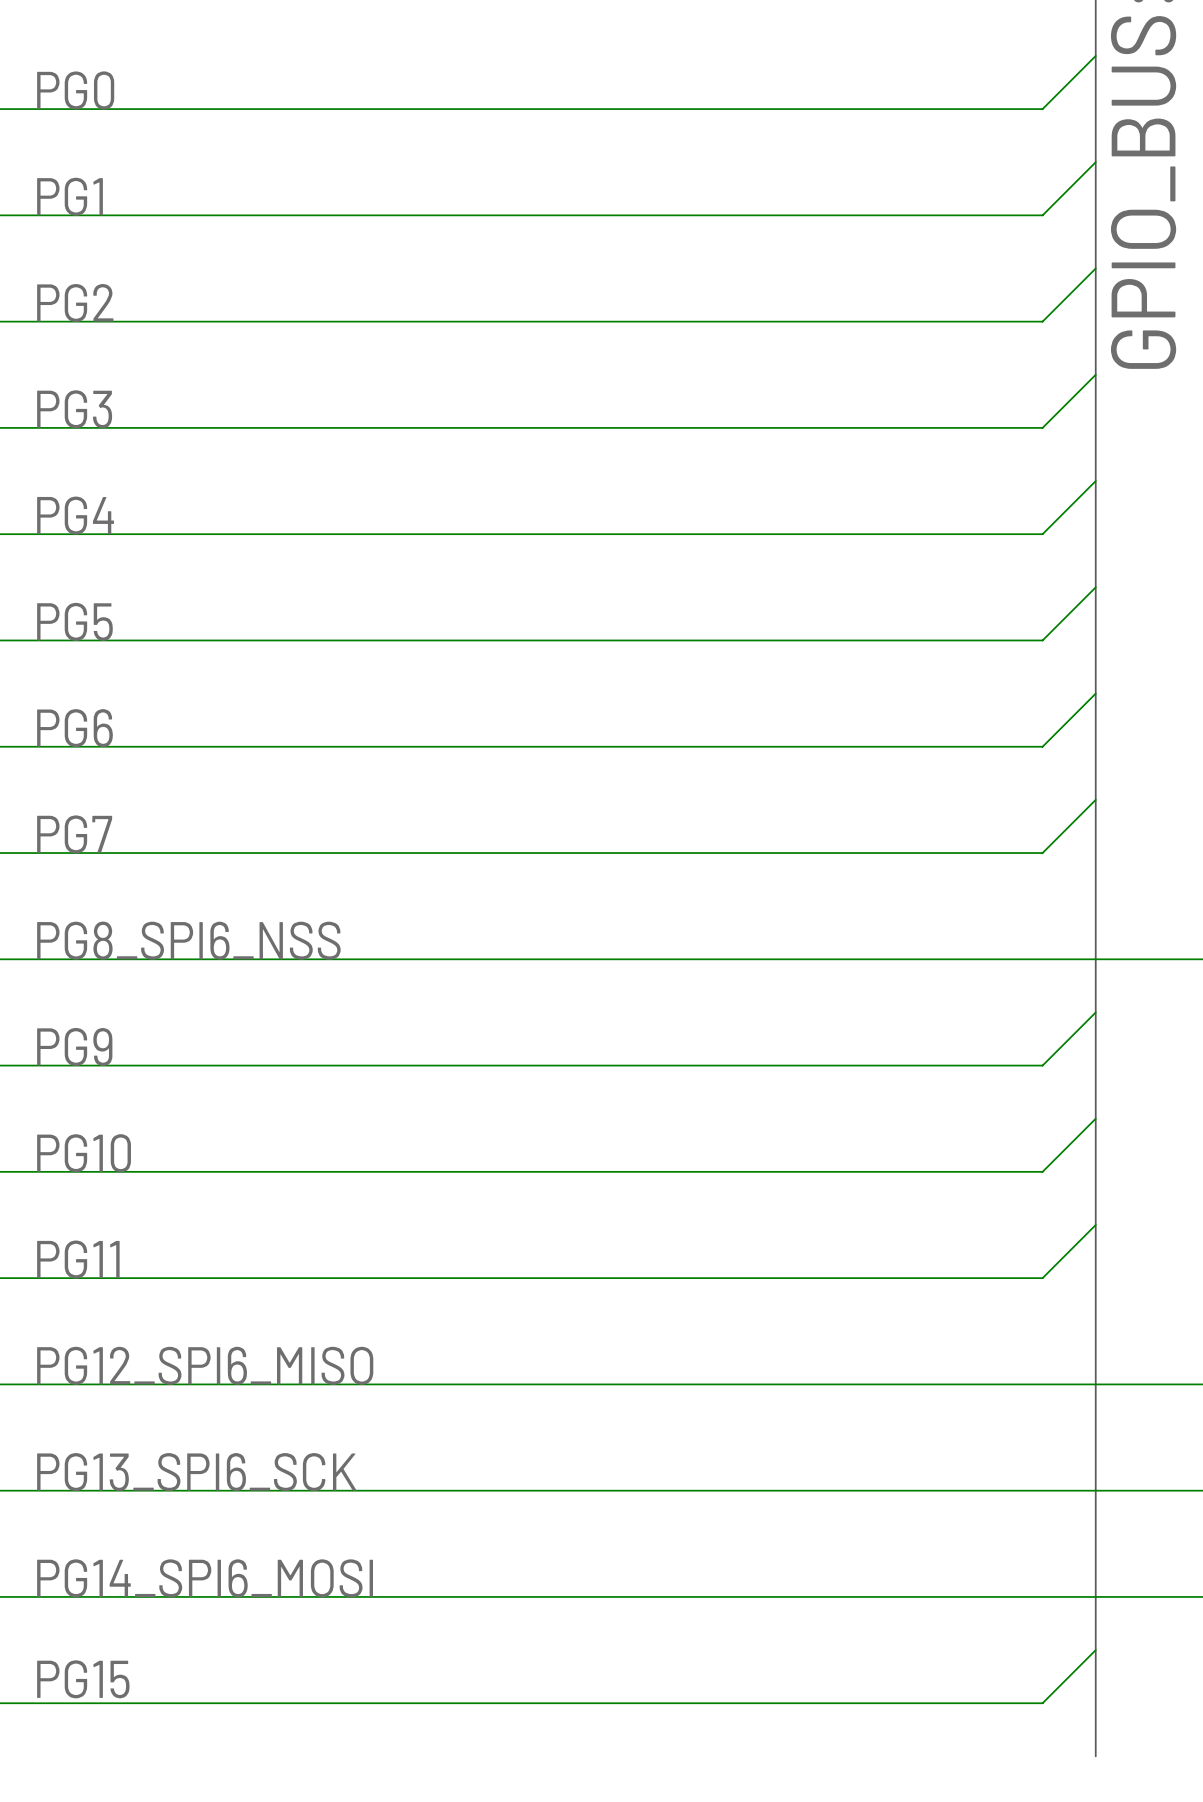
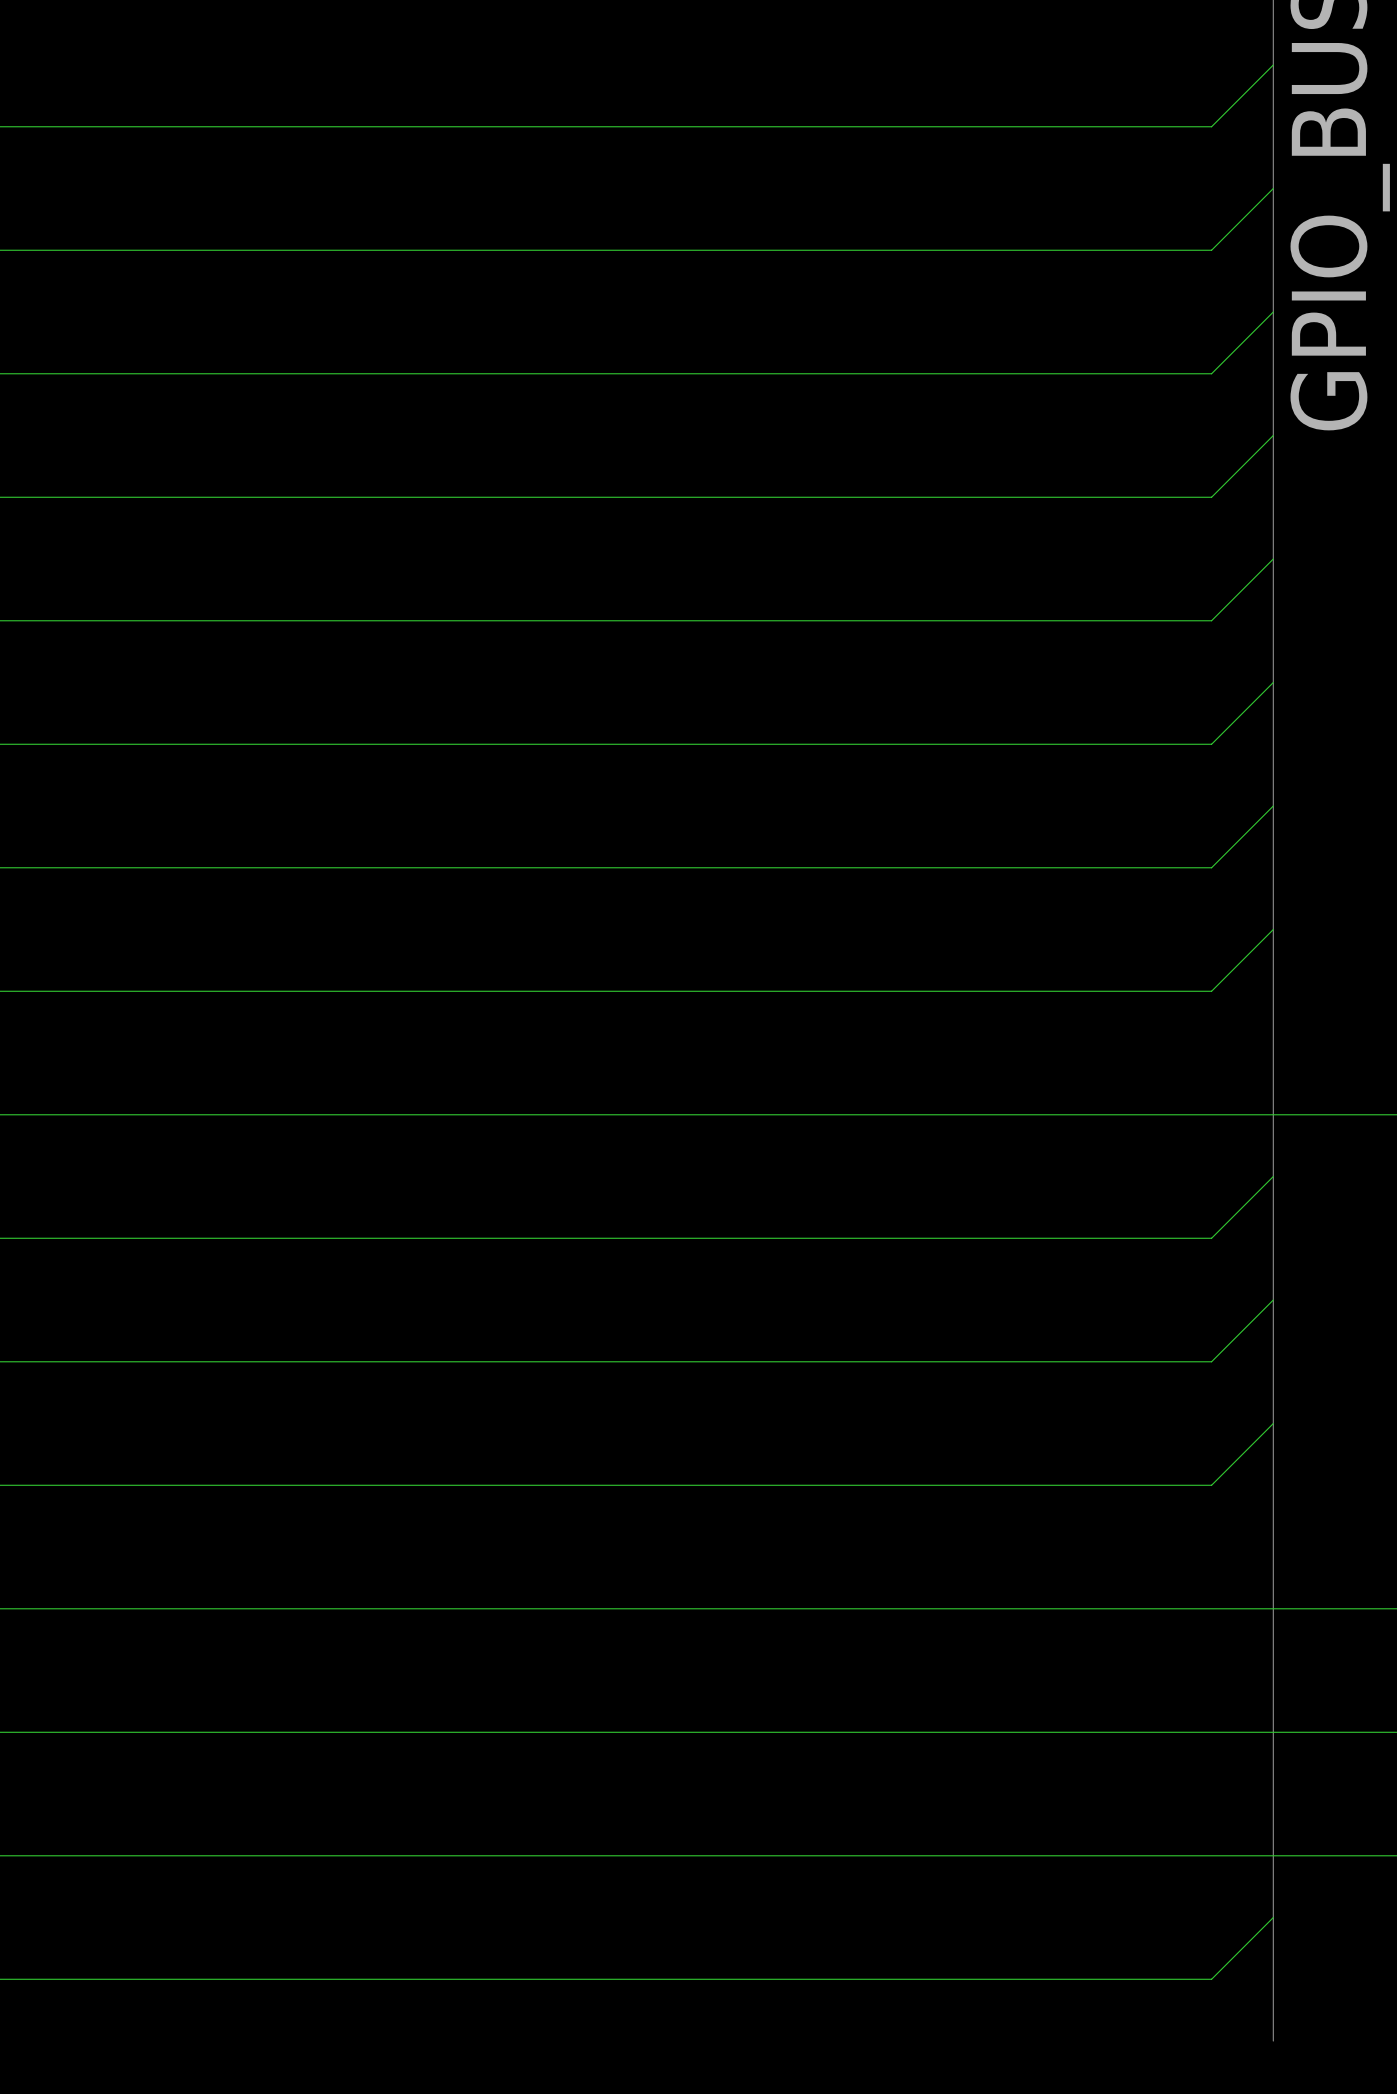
label: PG0 (75, 90) -> none
label: PG1 (70, 196) -> none
label: PG2 (75, 303) -> none
label: PG3 (74, 409) -> none
label: PG4 (75, 515) -> none
label: PG5 (74, 621) -> none
label: PG6 (74, 728) -> none
label: PG7 (74, 834) -> none
label: PG8_SPI6_NSS (188, 940) -> none
label: PG9 (74, 1046) -> none
label: PG10 (84, 1153) -> none
label: PG11 (78, 1259) -> none
label: PG12_SPI6_MISO (205, 1365) -> none
label: PG13_SPI6_SCK (196, 1472) -> none
label: PG14_SPI6_MOSI (205, 1578) -> none
label: PG15 (83, 1679) -> none

